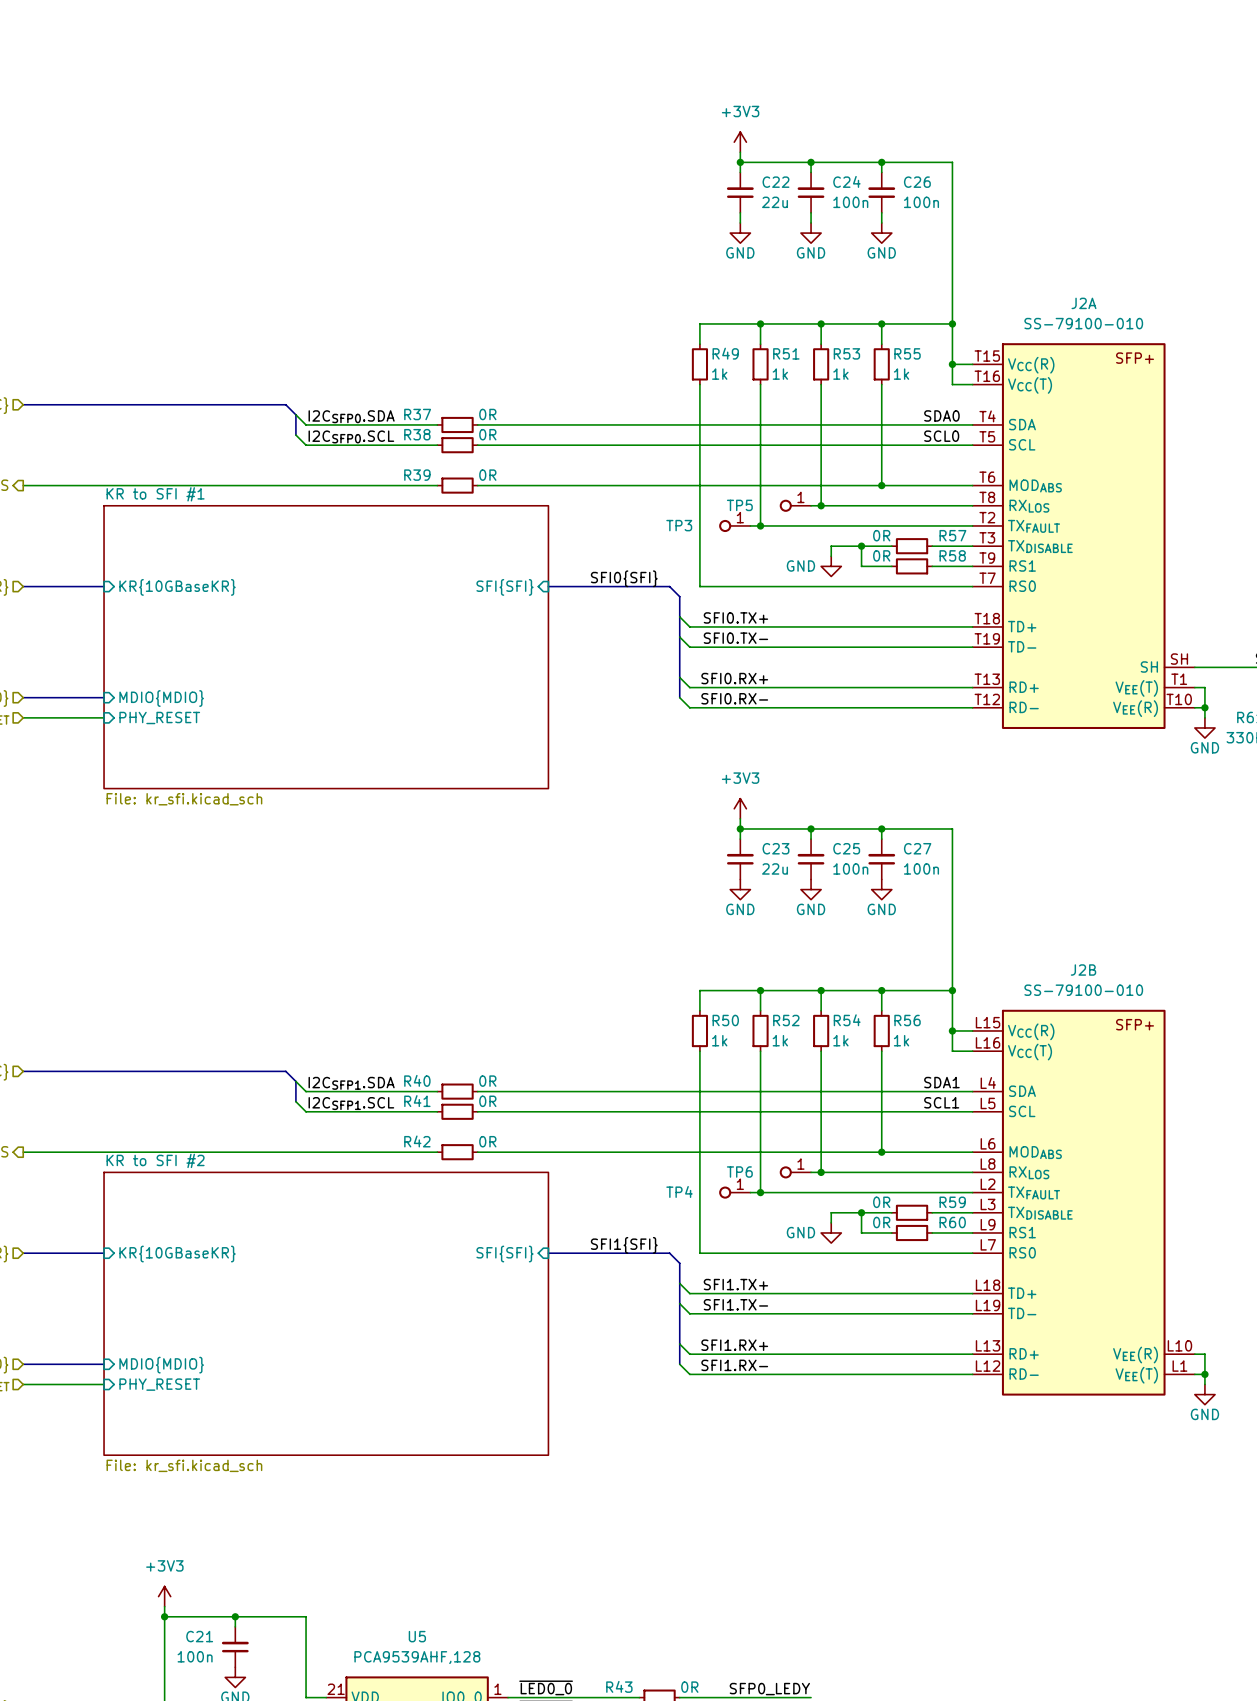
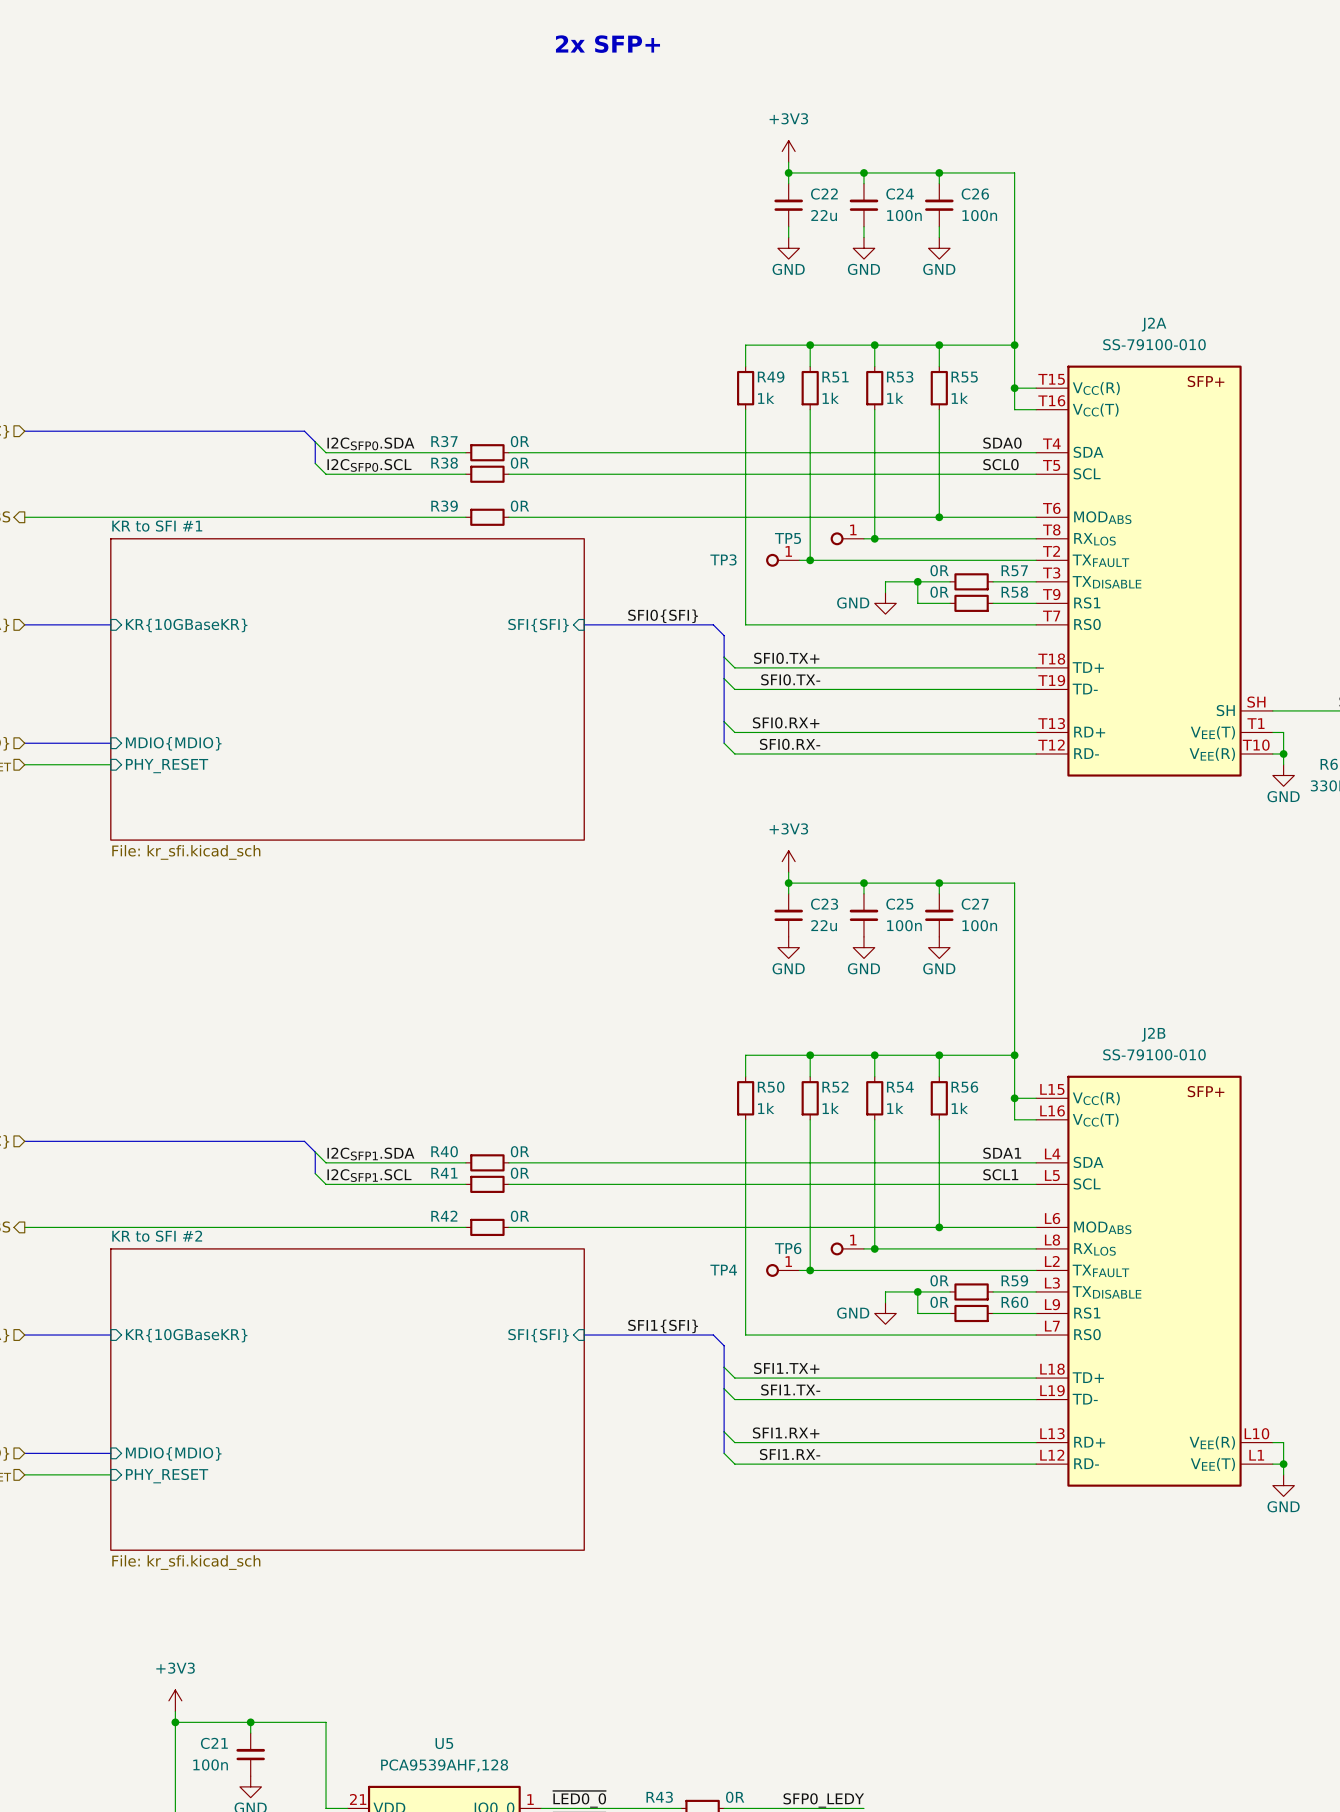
text: none -> 2x SFP+ (607, 44)

